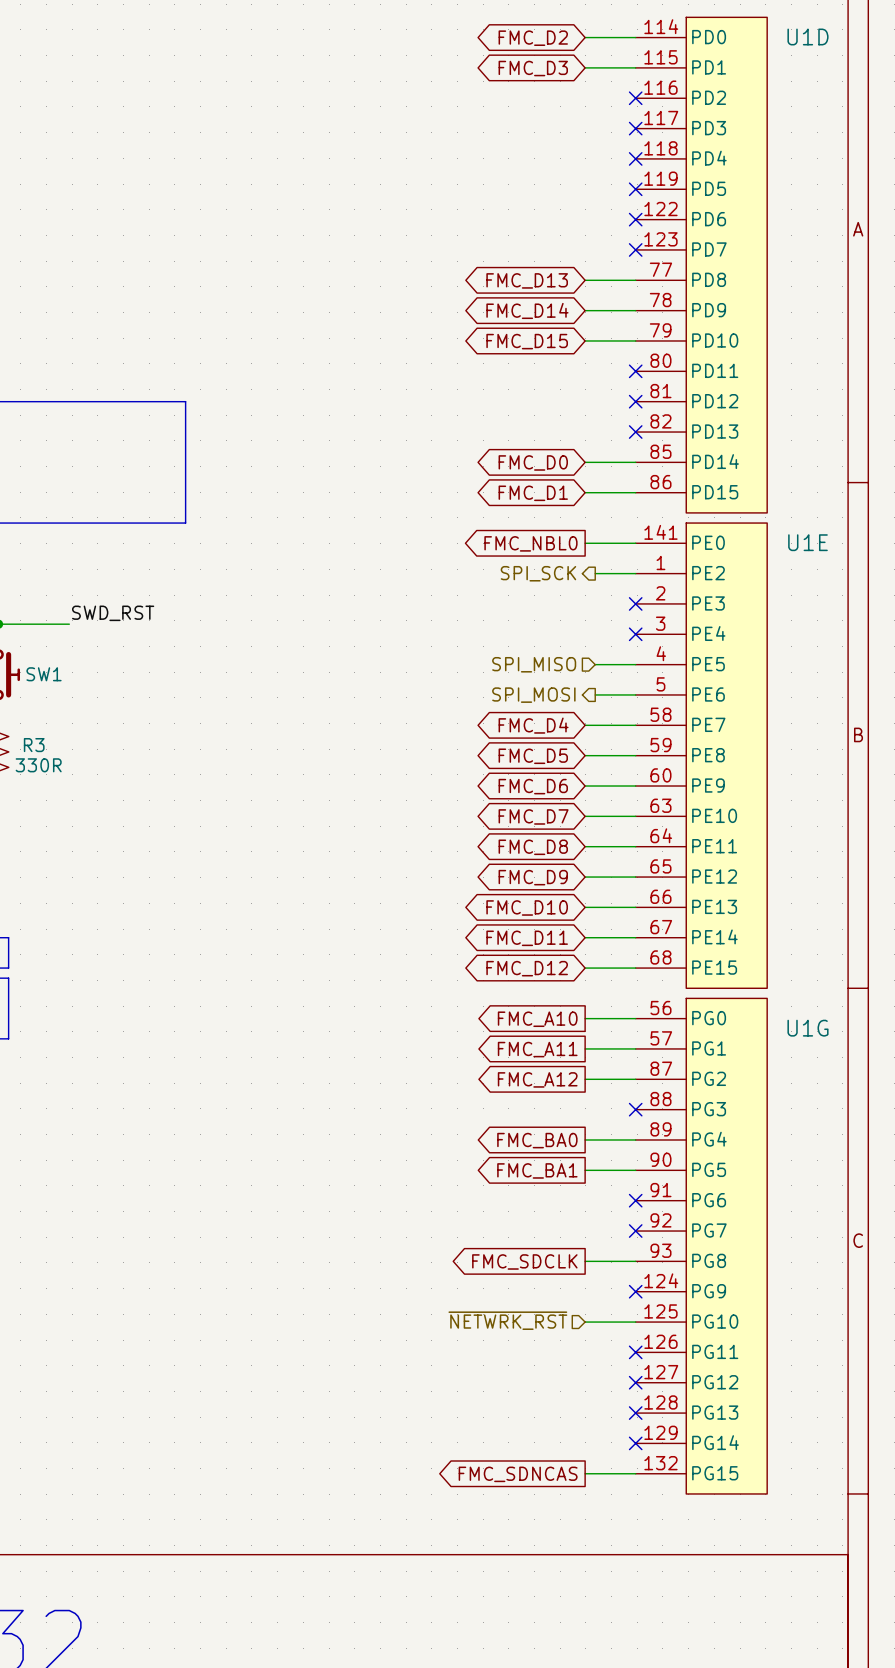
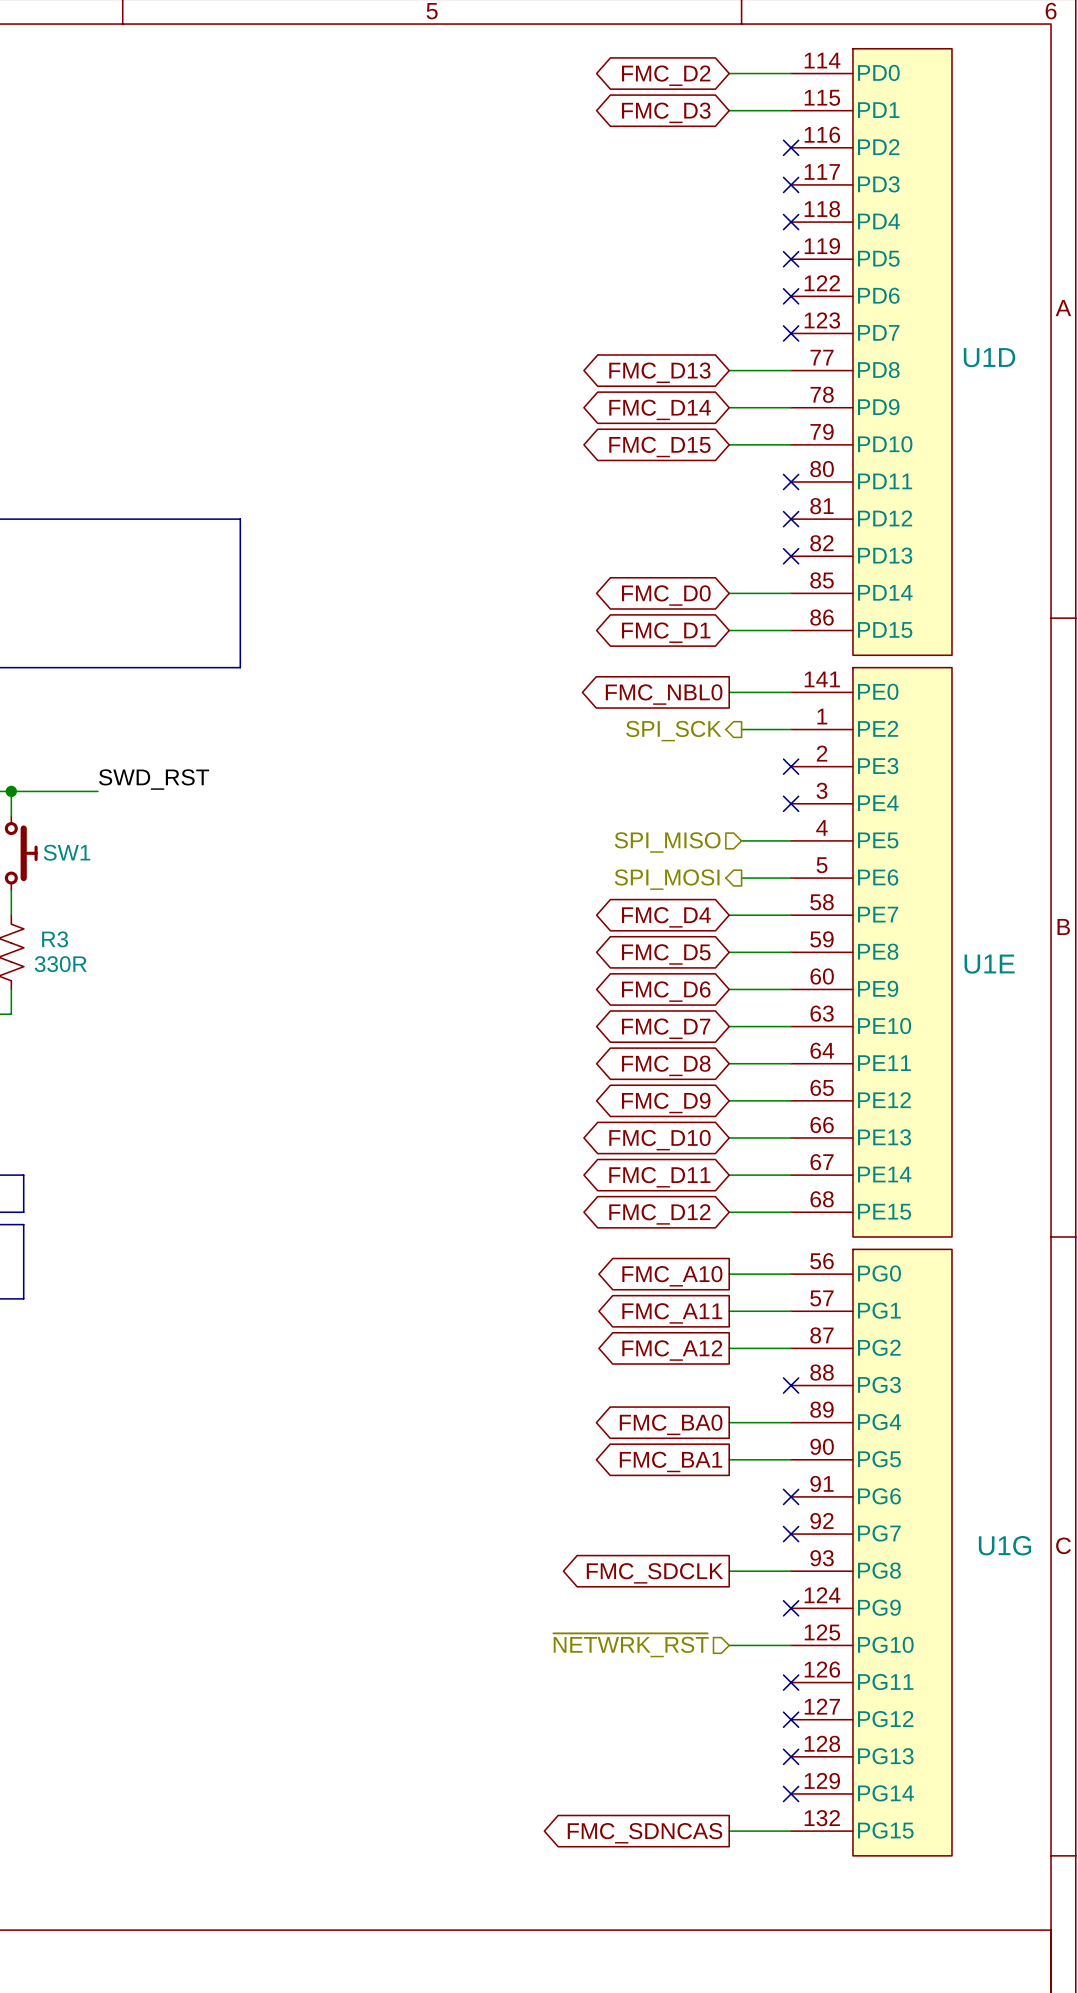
U1D name position: U1D (807, 36) -> U1D (989, 357)
U1E name position: U1E (807, 542) -> U1E (989, 964)
U1G name position: U1G (807, 1028) -> U1G (1004, 1545)

